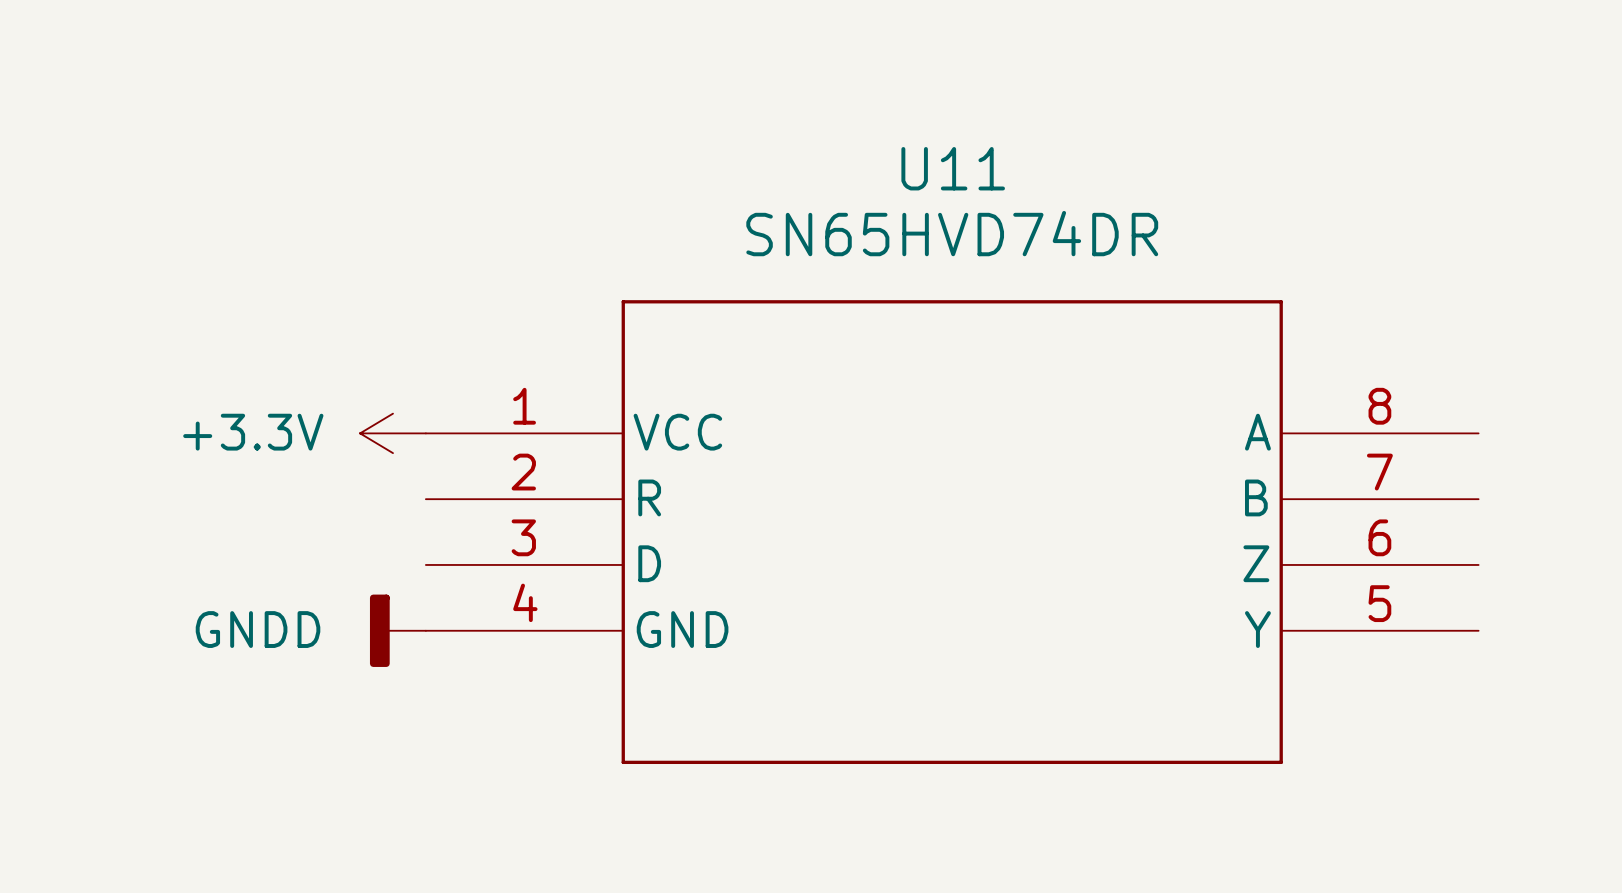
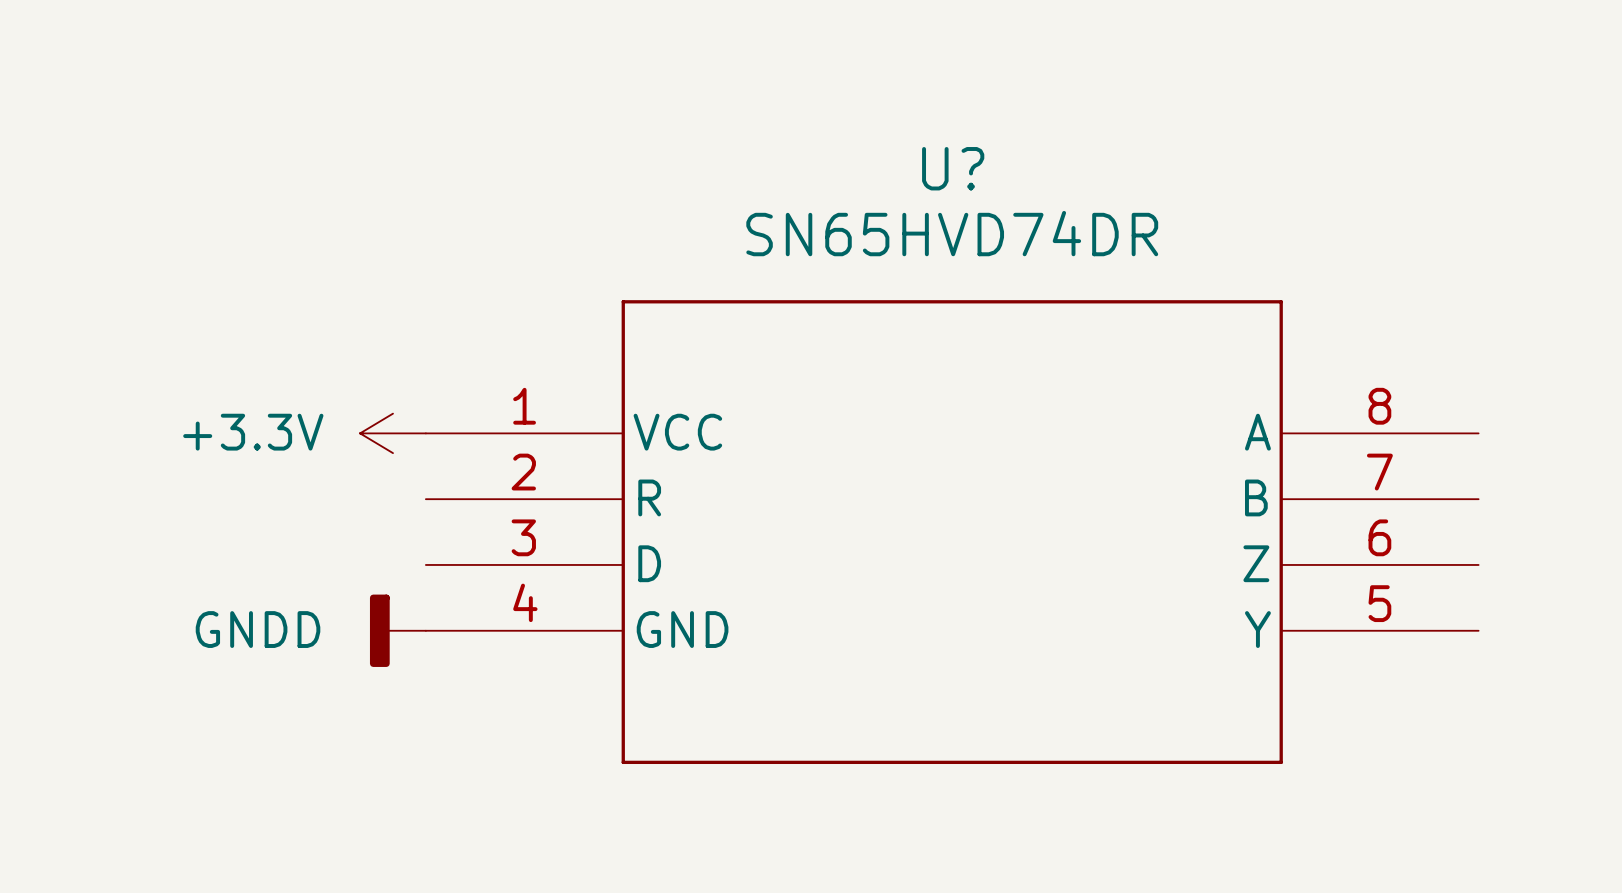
U11 name: U11 (953, 168) -> U? (953, 168)

